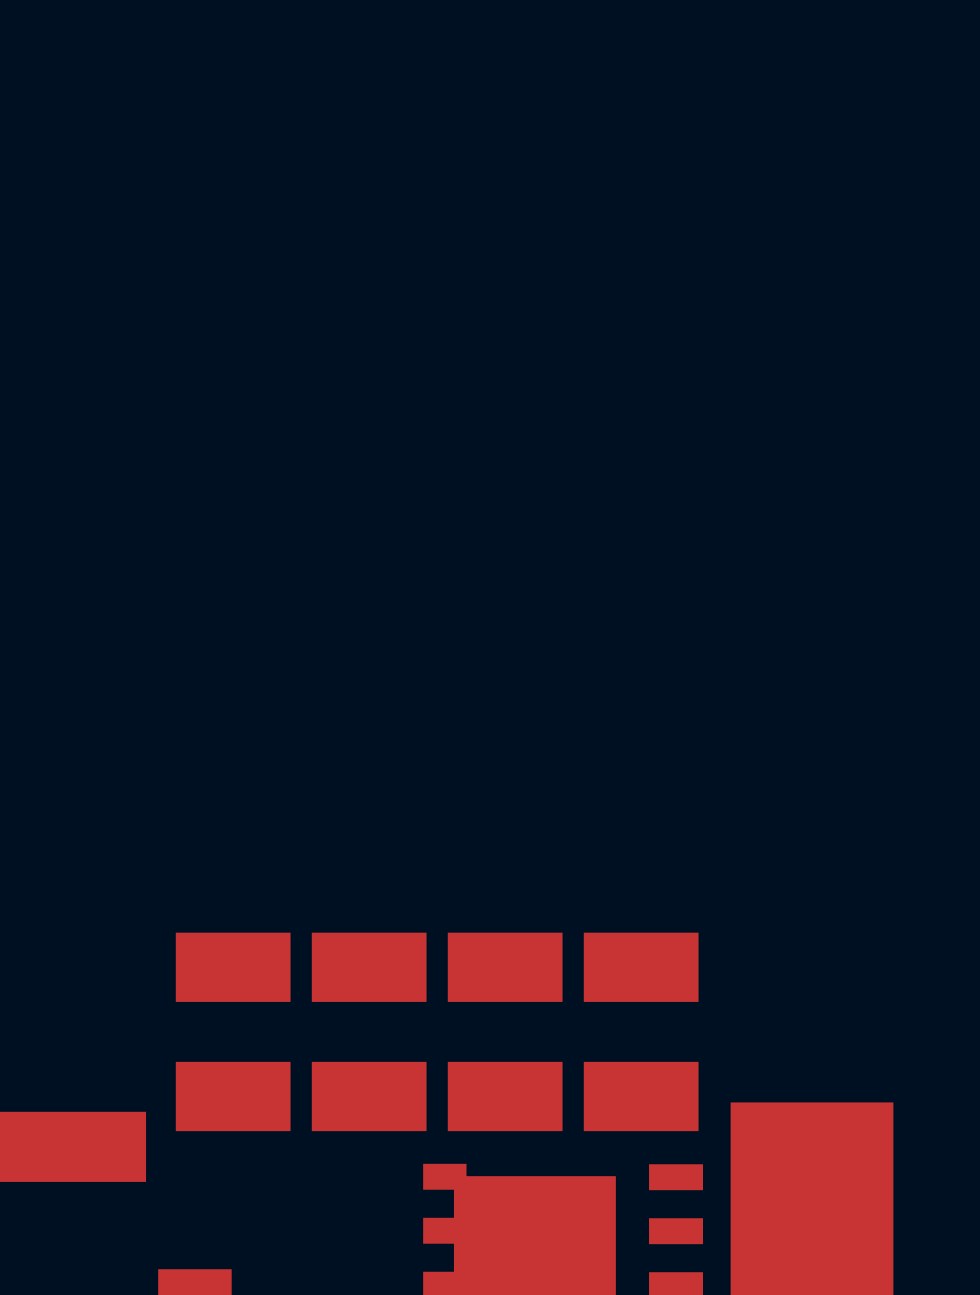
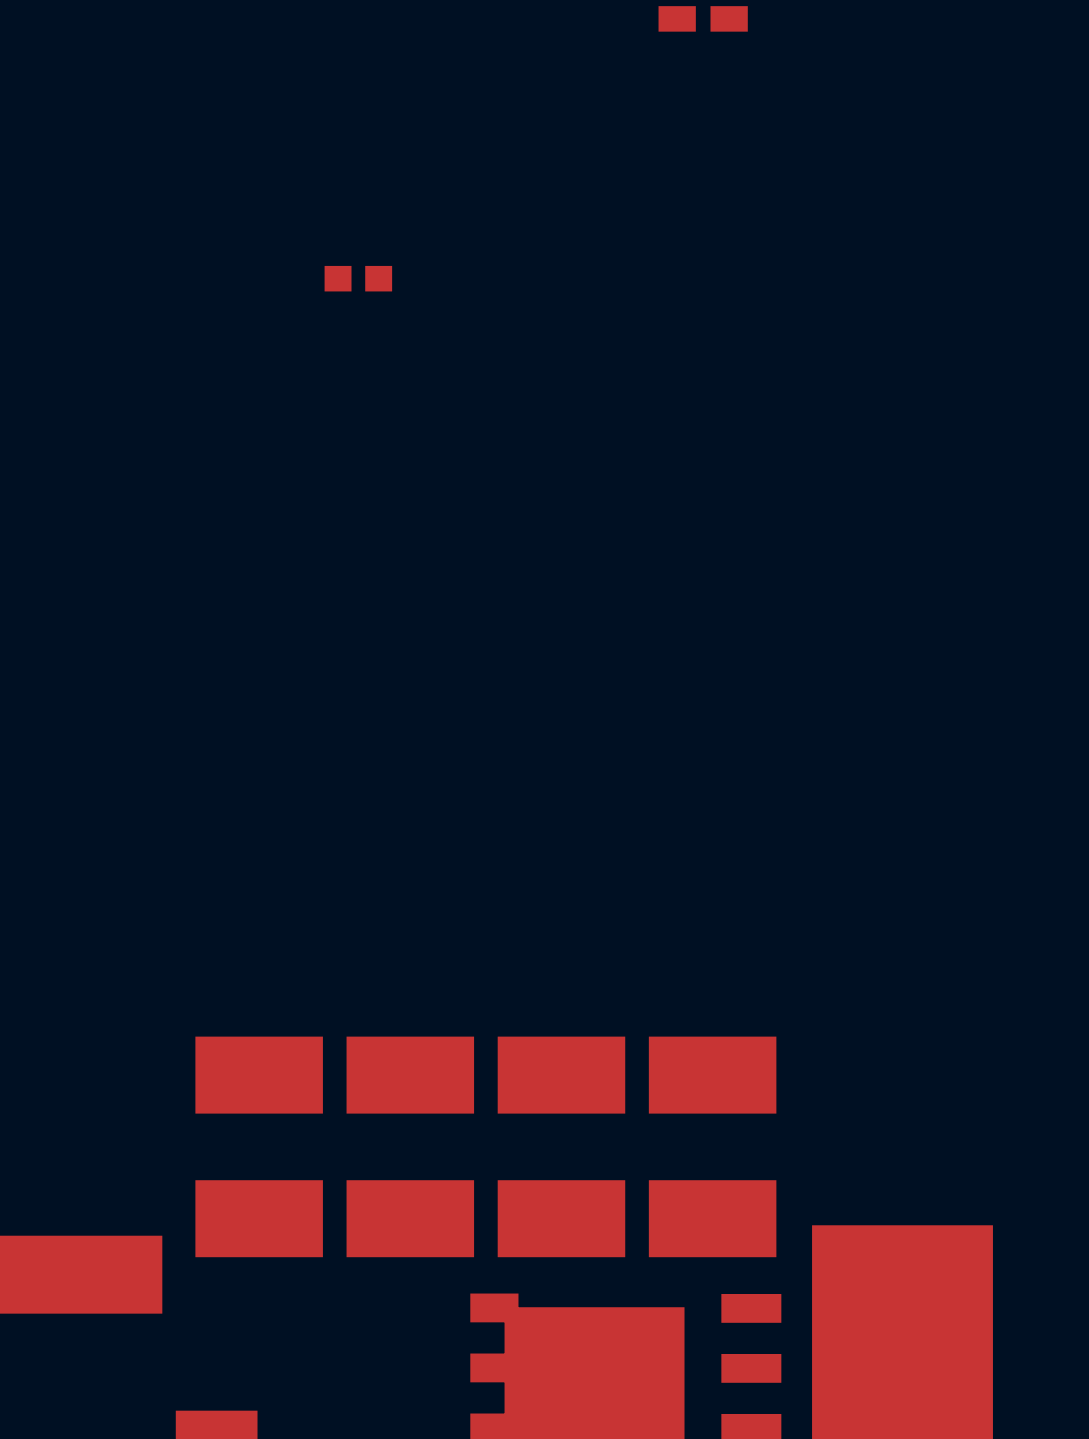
part: none -> (703, 18)
part: none -> (358, 278)

